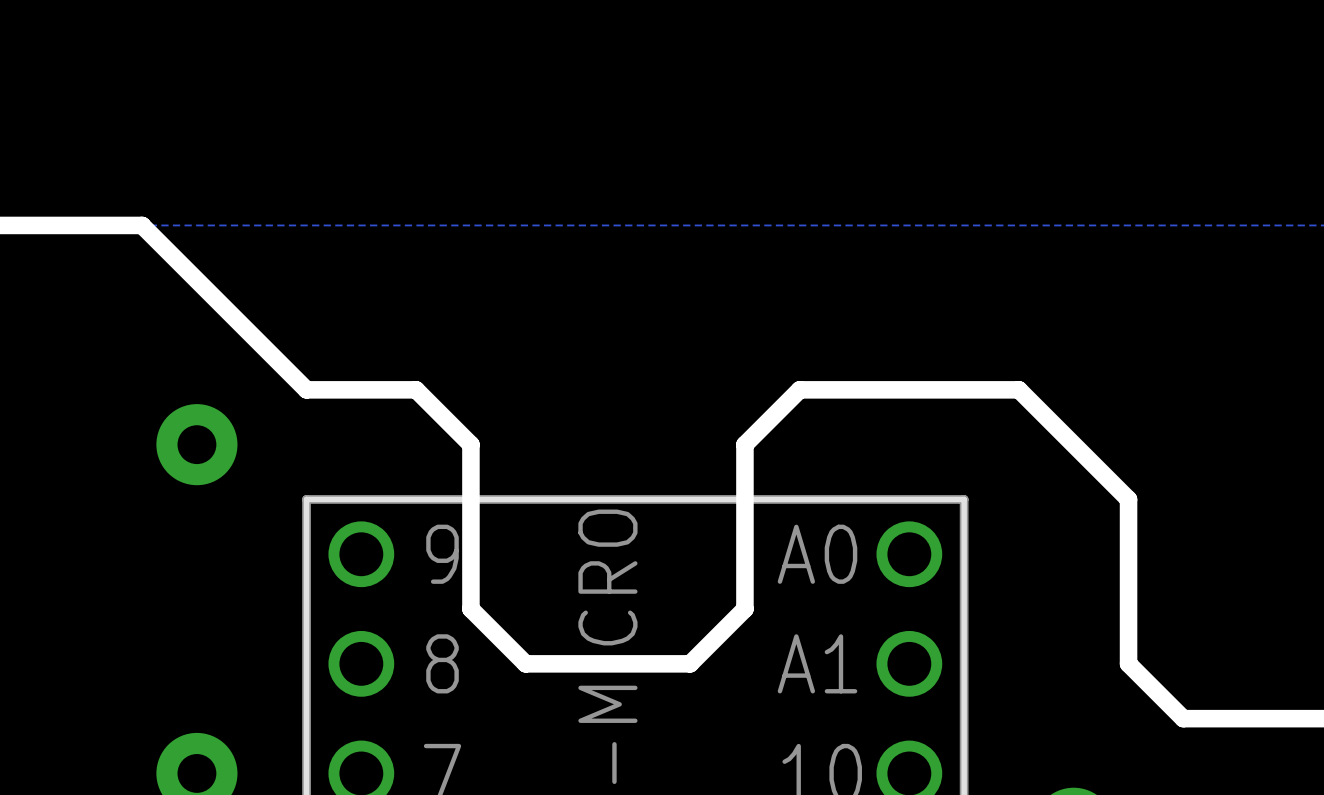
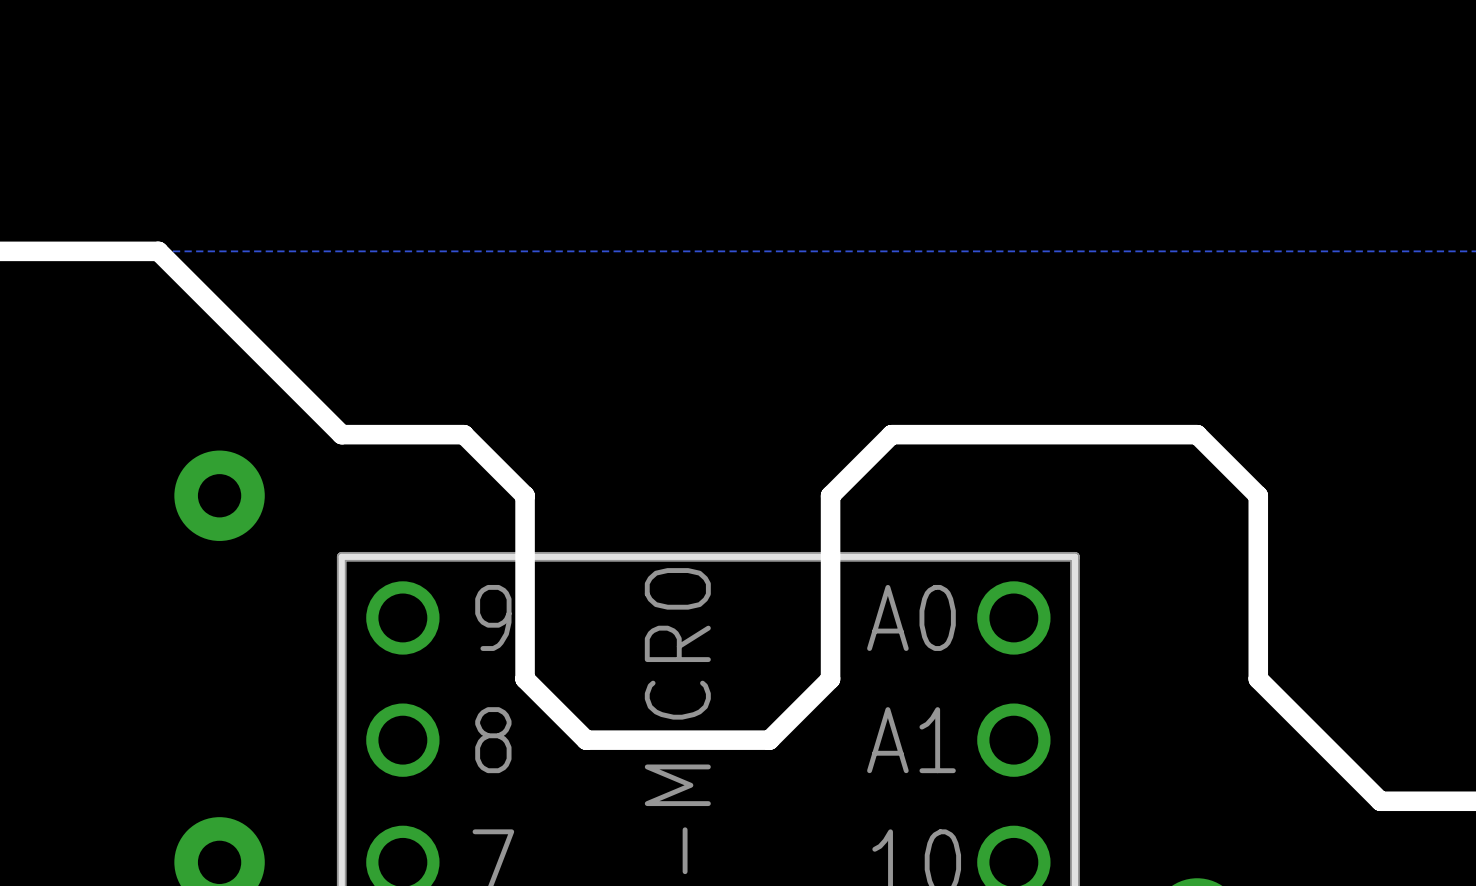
board edge: (1018, 389) (1128, 499) -> (1136, 434) (1197, 434) (1258, 495) (1258, 556)
board edge: (1128, 609) (1128, 663) (1183, 718) (1238, 718) -> (1258, 679) (1380, 801)

